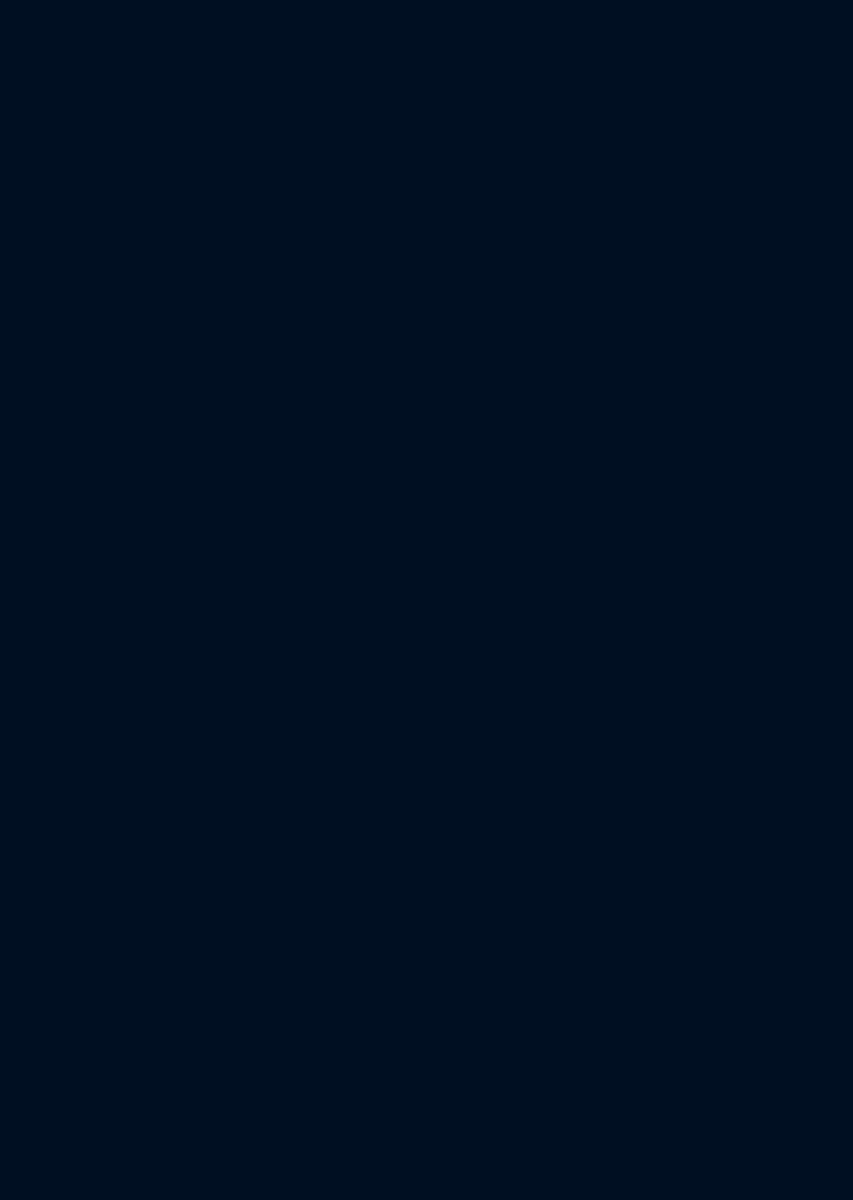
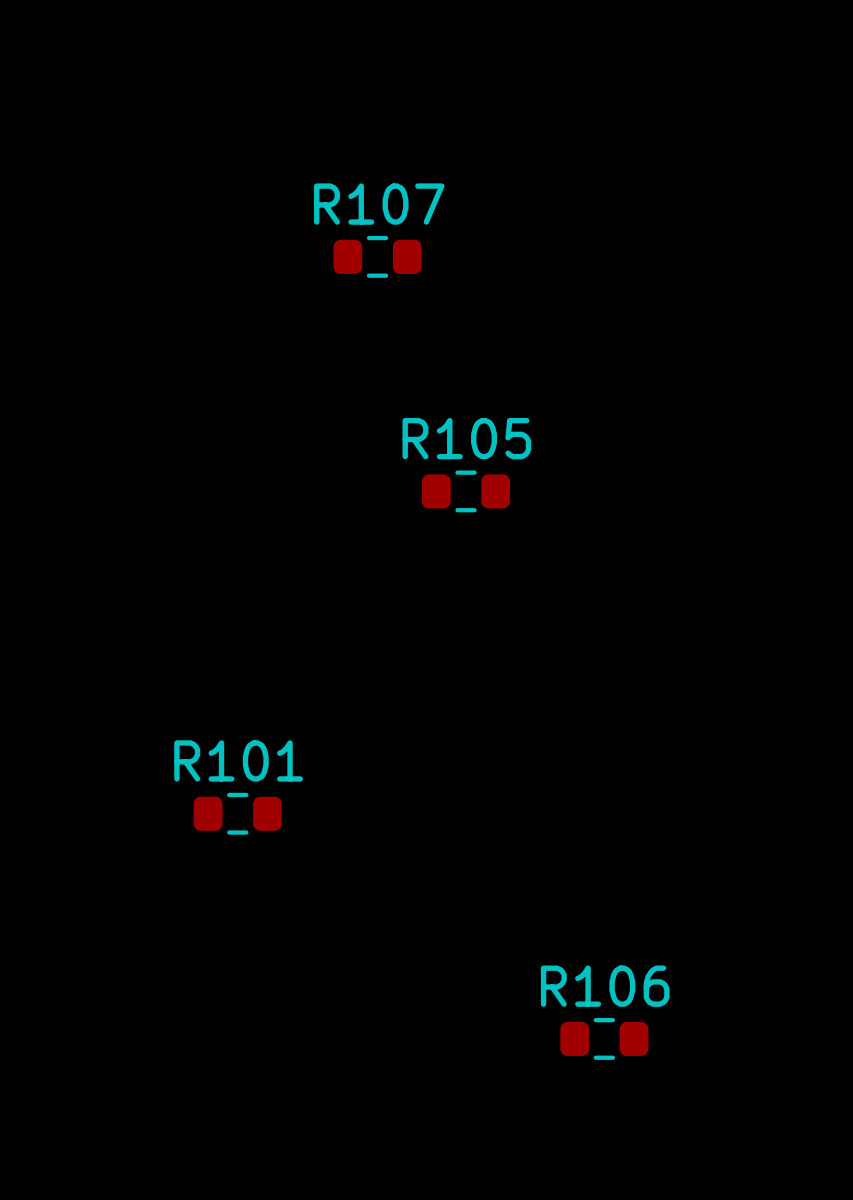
R107: none -> (377, 256)
R105: none -> (466, 491)
R101: none -> (237, 813)
R106: none -> (604, 1038)

